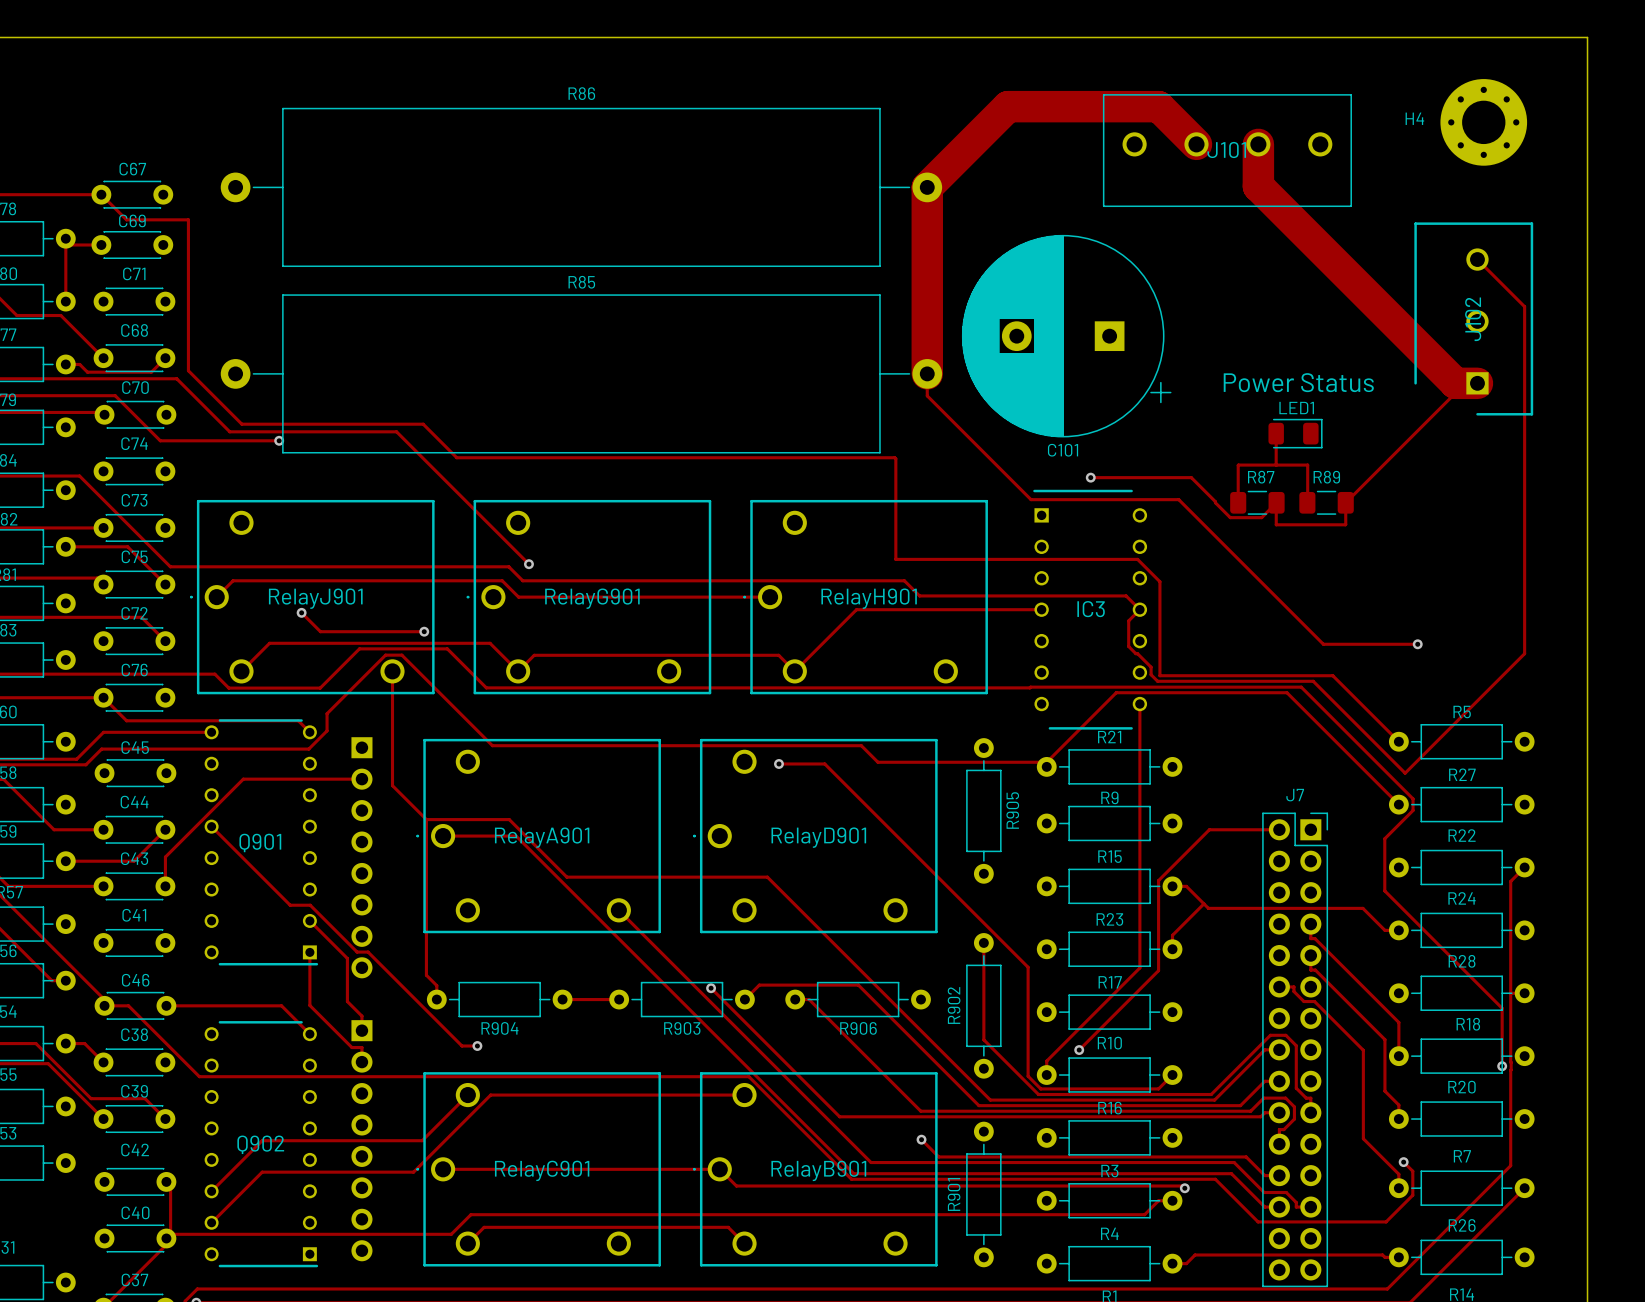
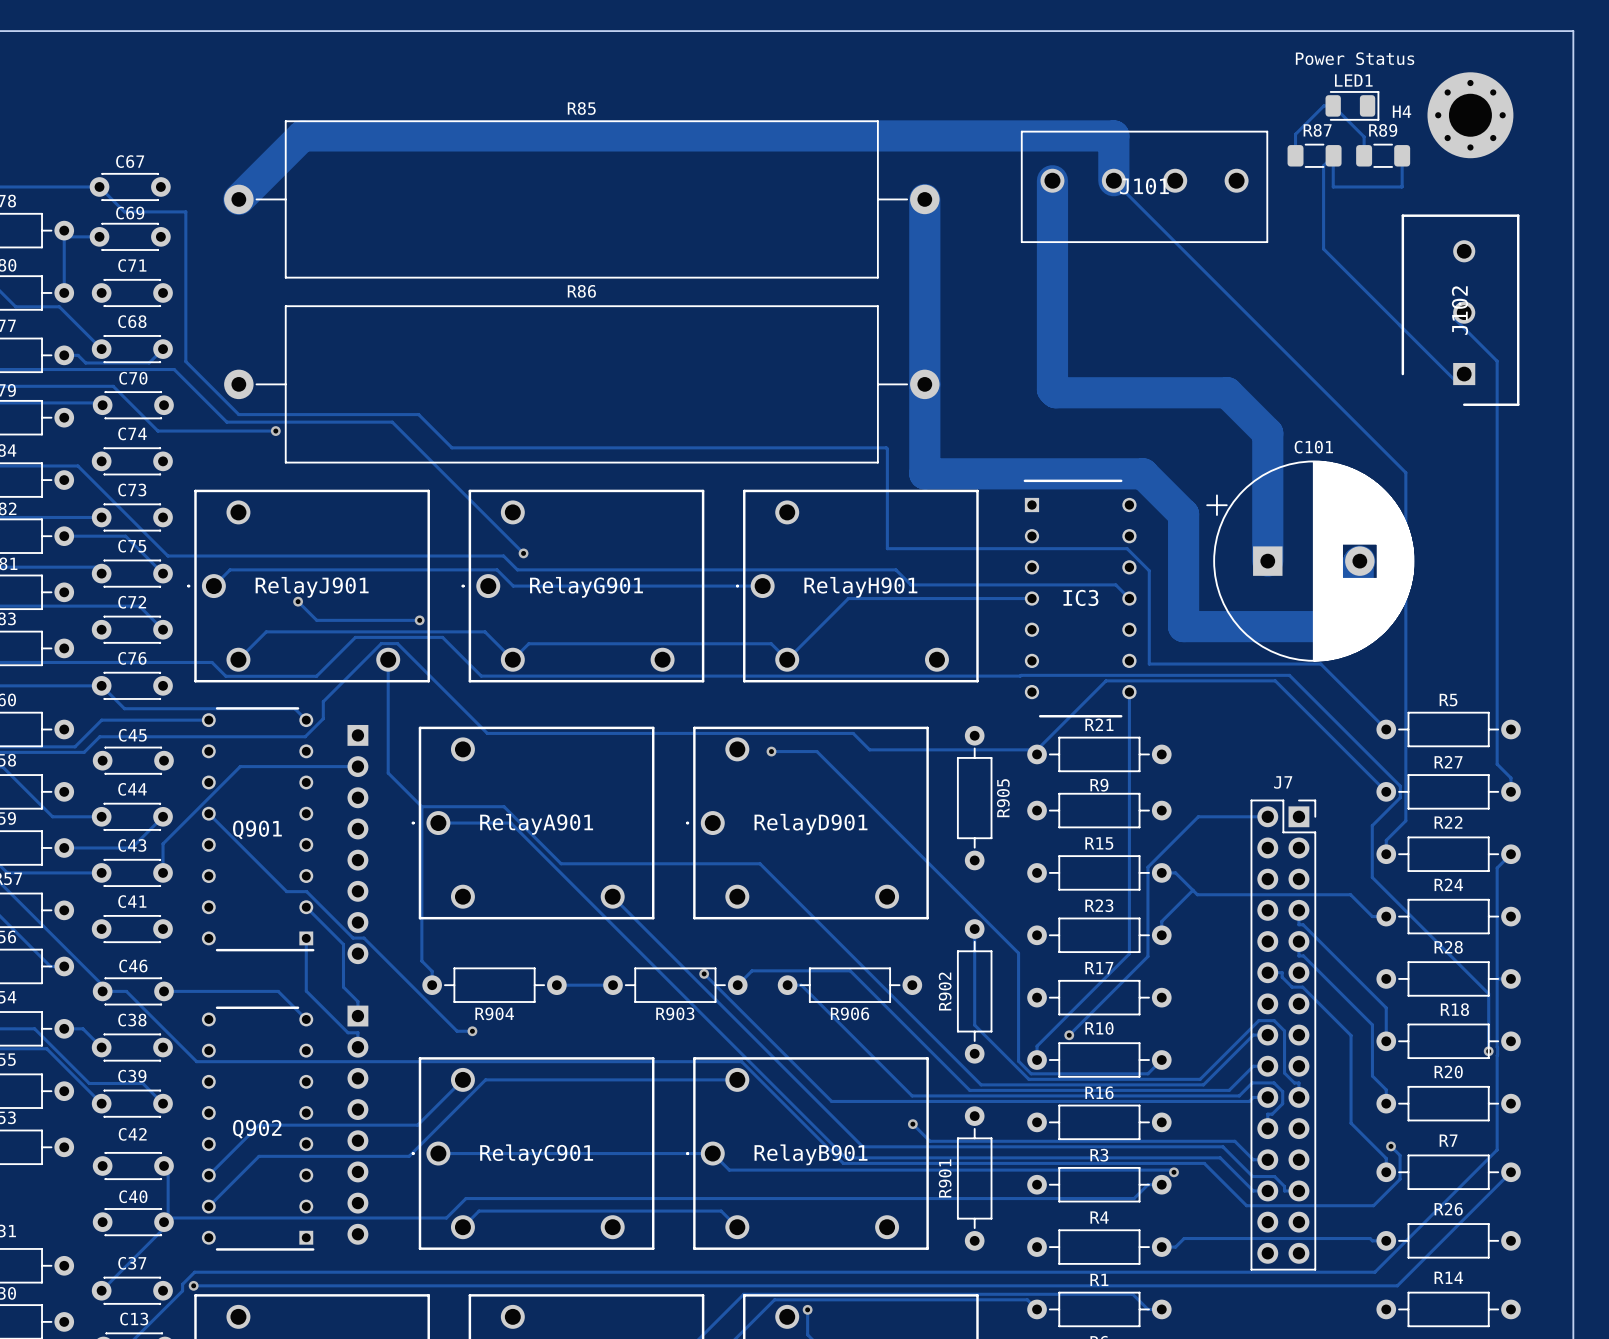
text: none -> Power Status (1355, 58)
track: (1196, 144) (1158, 106) (1008, 106) (927, 187) (927, 395) (1031, 499) (1178, 499) (1323, 644) (1417, 644) -> none
track: (1258, 144) (1258, 186) (1455, 383) (1477, 383) (1465, 383) (1345, 502) (1345, 524) (1276, 524) (1276, 503) -> none
J101 position: (1227, 150) -> (1144, 186)
track: none -> (1295, 155) (1295, 134) (1323, 105) (1333, 105) (1364, 136) (1364, 155)
track: none -> (1333, 155) (1323, 165) (1323, 249) (1454, 380)
track: none -> (1402, 155) (1401, 186) (1333, 186) (1333, 156)
R86 position: (581, 187) -> (581, 384)
track: none -> (1052, 180) (1052, 389) (1055, 392) (1227, 392) (1267, 433) (1267, 561)
track: none -> (238, 199) (302, 135) (1113, 135) (1113, 180) (1405, 472) (1405, 820) (1386, 840) (1386, 854)
track: none -> (924, 199) (924, 473) (1143, 473) (1183, 514) (1183, 626) (1358, 626) (1358, 562) (1359, 561)
track: (1477, 259) (1524, 306) (1524, 653) (1405, 773) (1313, 681) (1157, 681) (1151, 674) (1151, 667) (1128, 646) (1128, 620) (1139, 609) -> none
track: none -> (1454, 318) (1497, 361) (1497, 764) (1510, 778) (1510, 791)
C101 rotation: 0° (1066, 336) -> 180° (1310, 561)
C101 position: (1066, 336) -> (1310, 561)
R85 position: (581, 373) -> (581, 199)
text: Power Status (1298, 382) -> none
LED1 position: (1295, 433) -> (1352, 105)
track: (1090, 477) (1191, 477) (1230, 517) (1261, 517) (1276, 502) -> none
via: (1090, 477) -> none
track: (1238, 502) (1238, 465) (1307, 465) (1307, 502) -> none
R87 position: (1257, 502) -> (1314, 155)
R89 position: (1326, 502) -> (1383, 155)
via: (1417, 644) -> none

